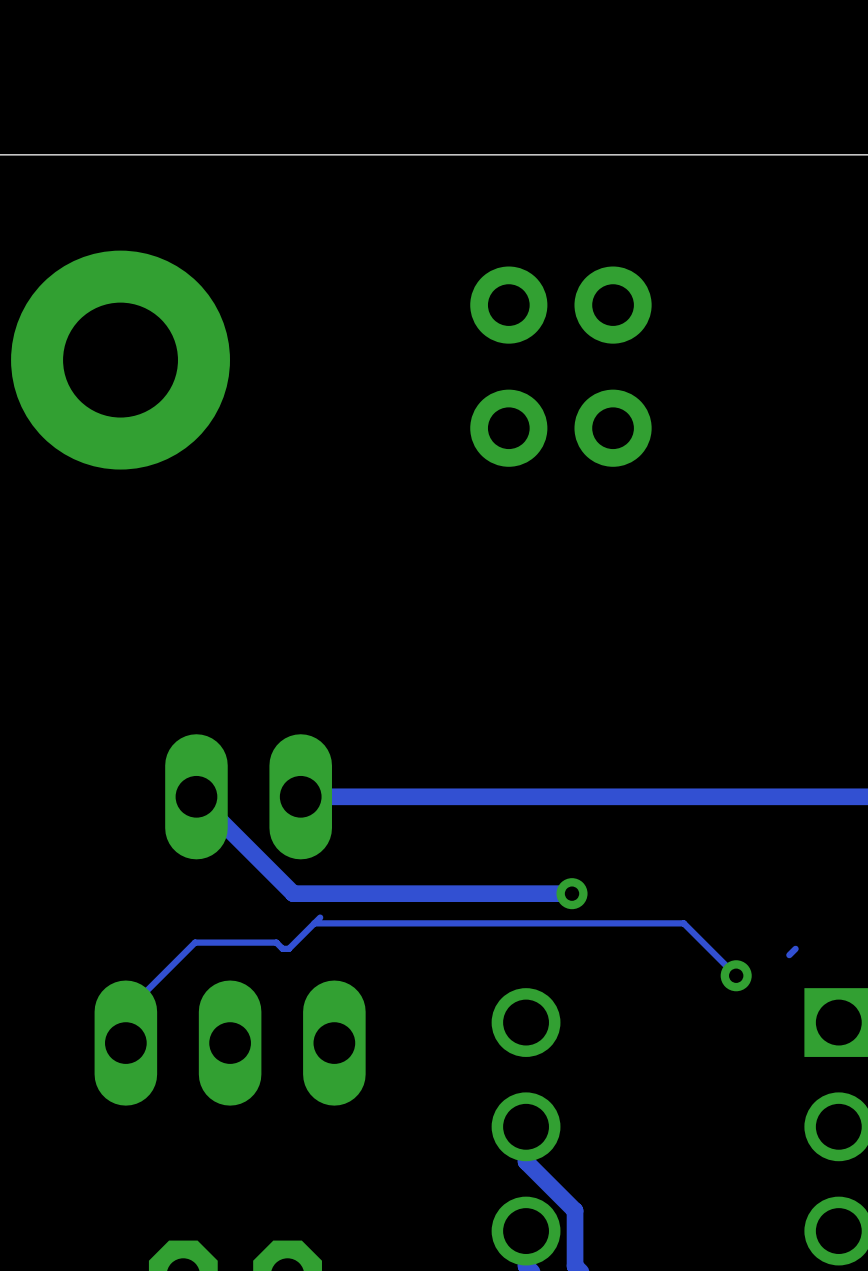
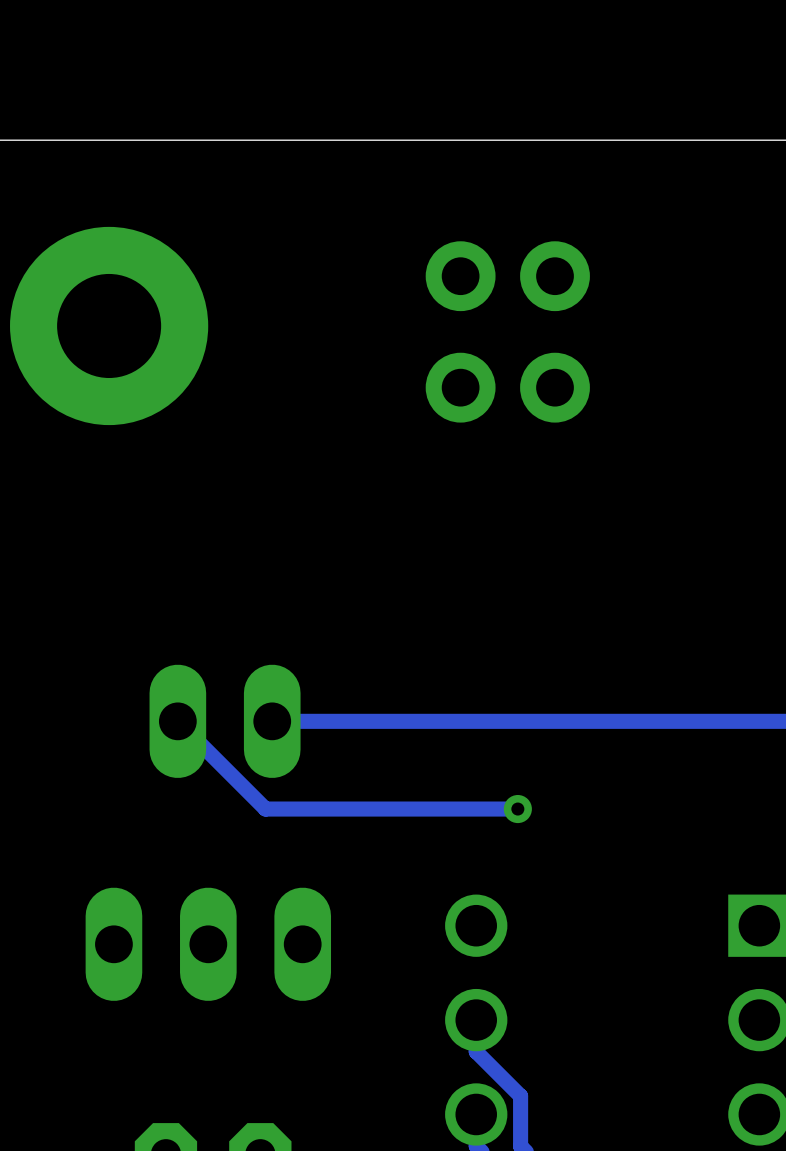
track: (320, 917) (288, 948) (282, 948) (276, 942) (195, 942) (126, 1011) (126, 1042) -> none
track: (314, 923) (683, 923) (736, 975) -> none
track: (795, 948) (789, 955) -> none
via: (736, 975) -> none

